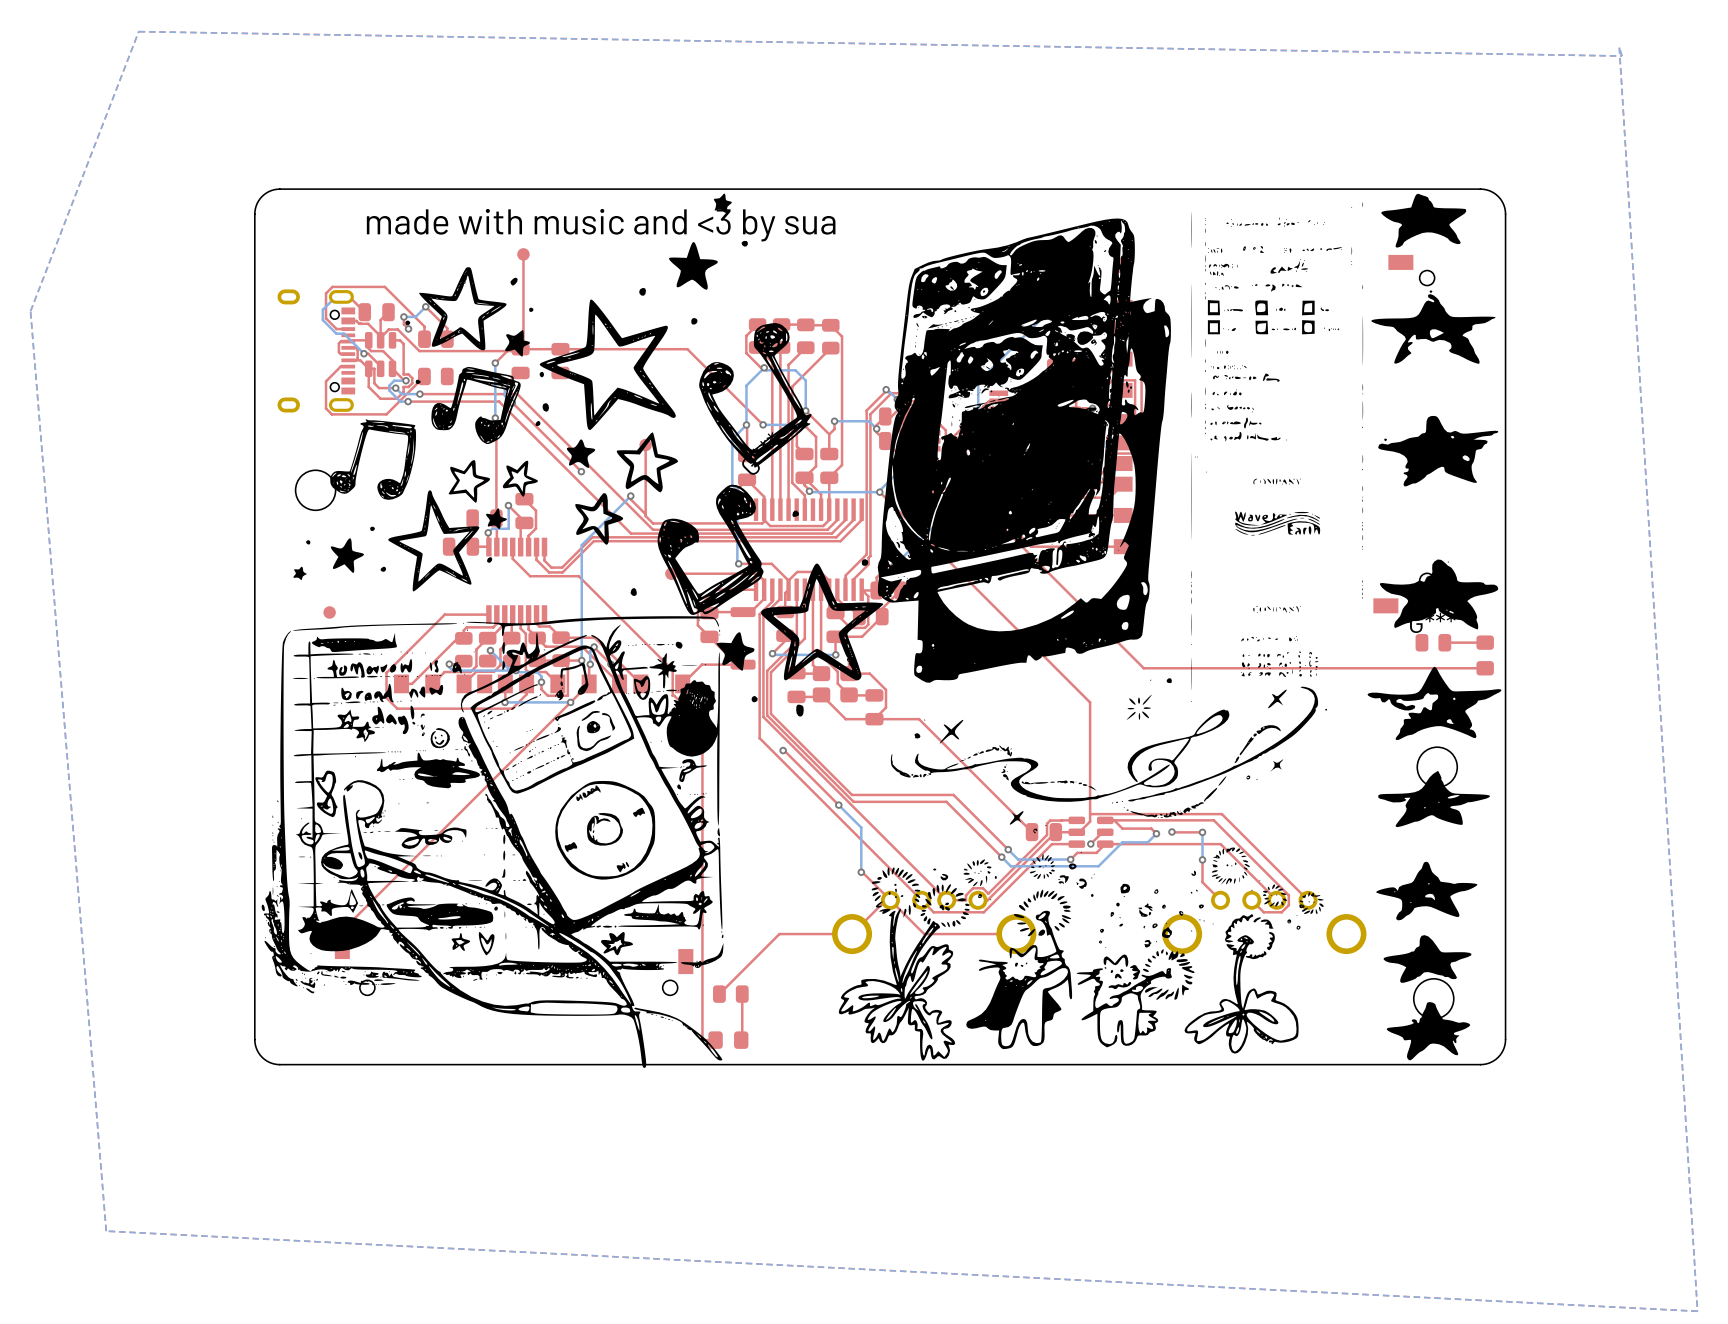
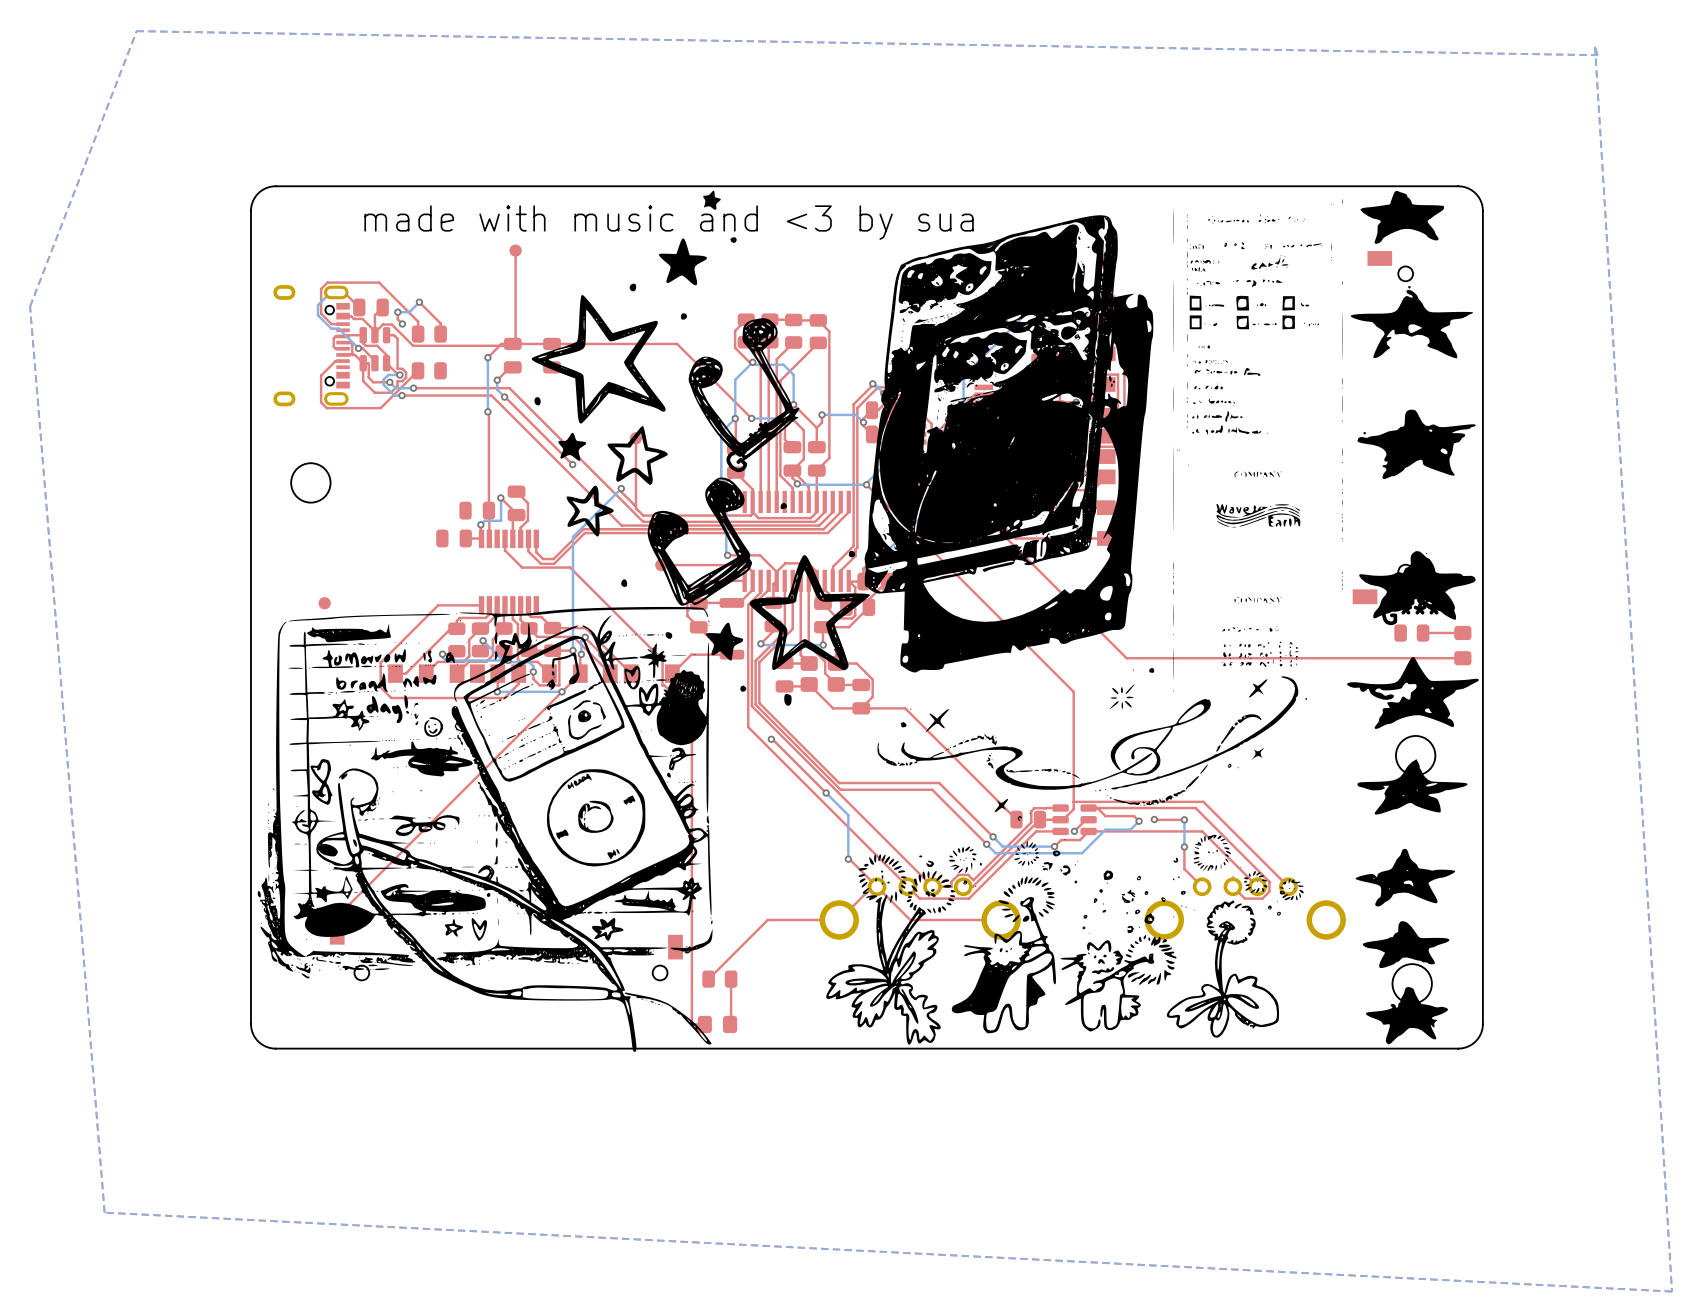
drawing: [293, 267, 544, 592] -> none

